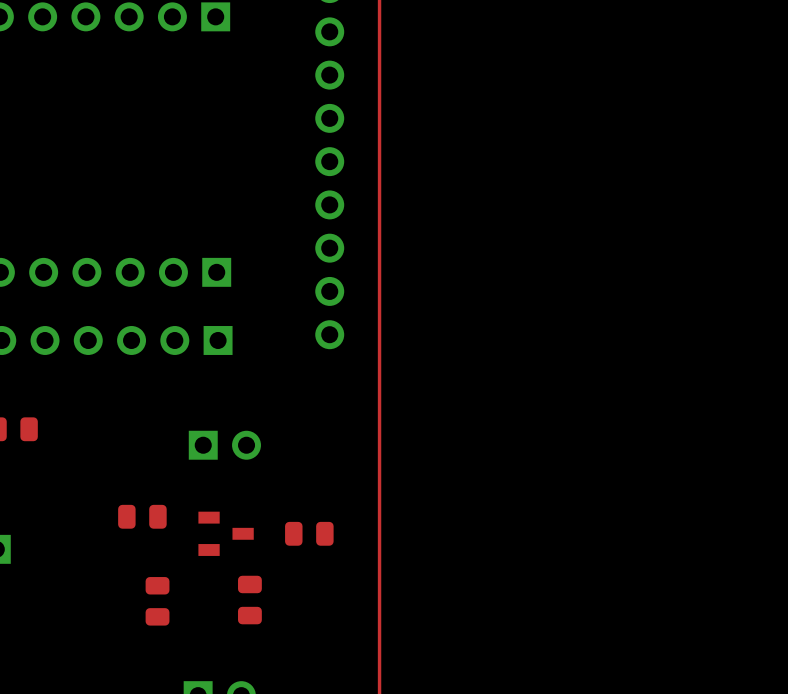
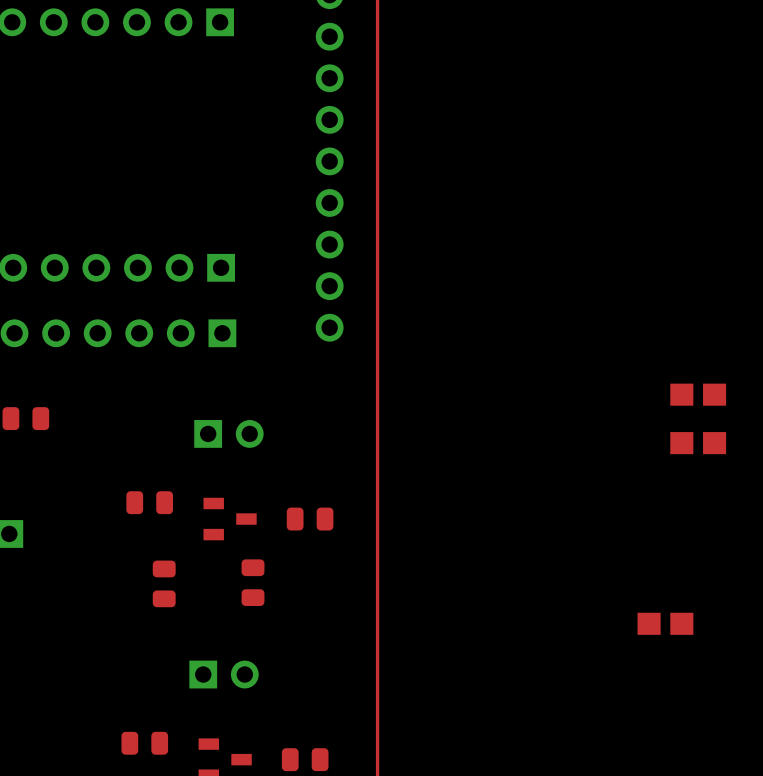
part: none -> (698, 394)
part: none -> (698, 443)
part: none -> (665, 623)

